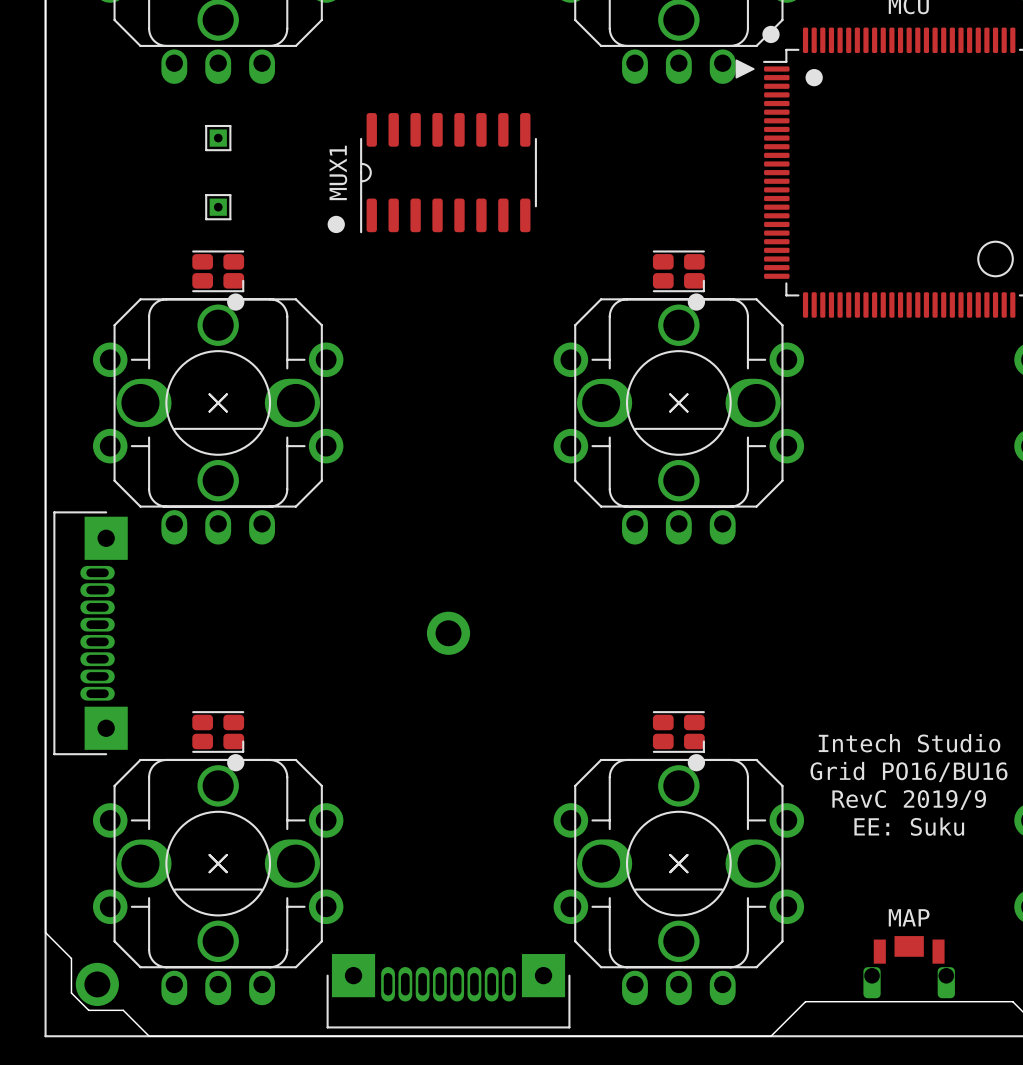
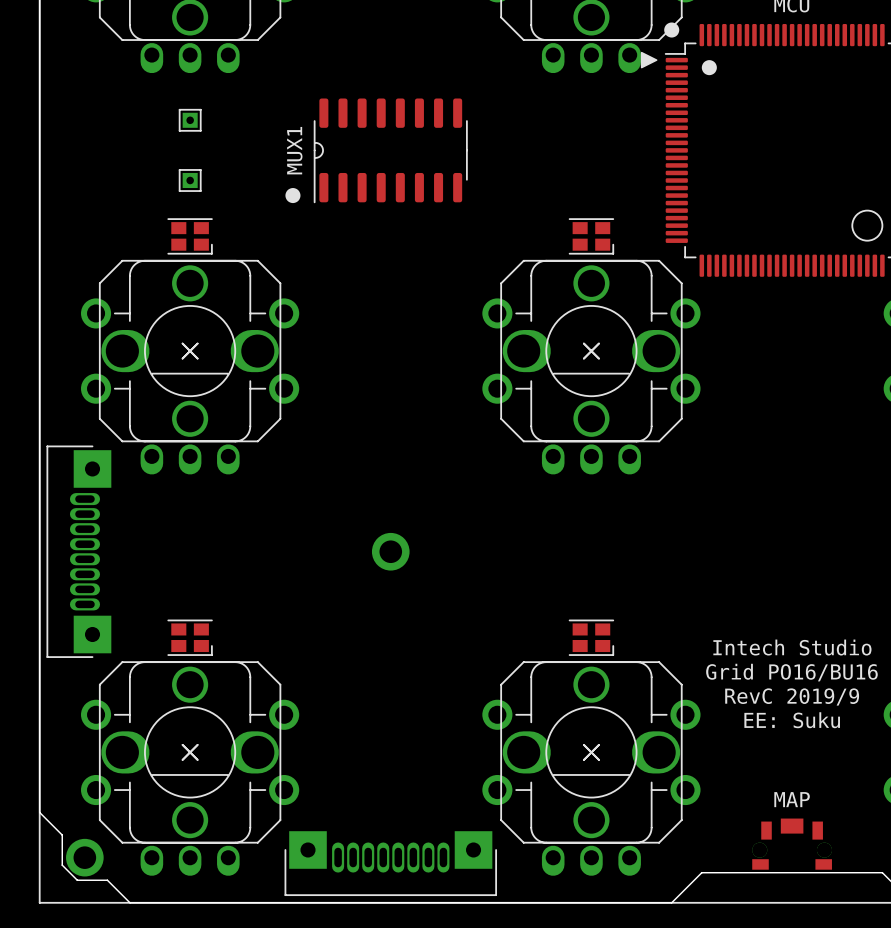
part footprint: [192, 250, 245, 311] -> [167, 218, 213, 255]
part footprint: [652, 250, 706, 311] -> [568, 218, 615, 255]
part footprint: [192, 711, 245, 772] -> [167, 619, 213, 656]
part footprint: [652, 711, 706, 772] -> [568, 619, 615, 656]
part footprint: [863, 936, 955, 999] -> [752, 818, 832, 870]

